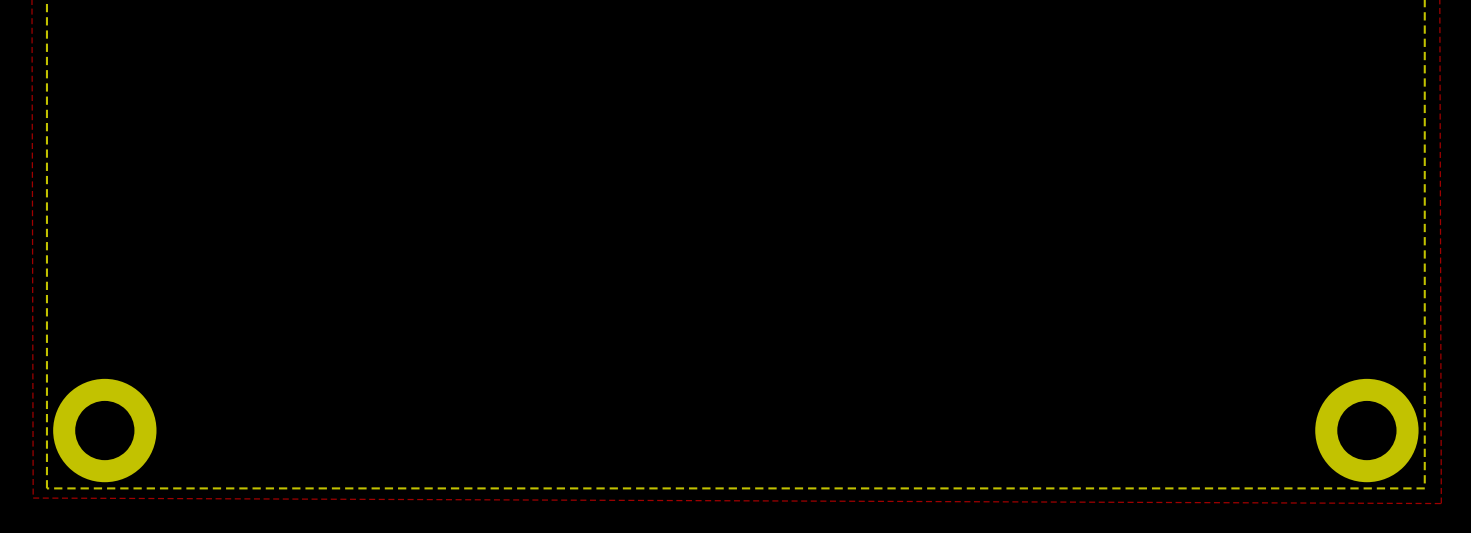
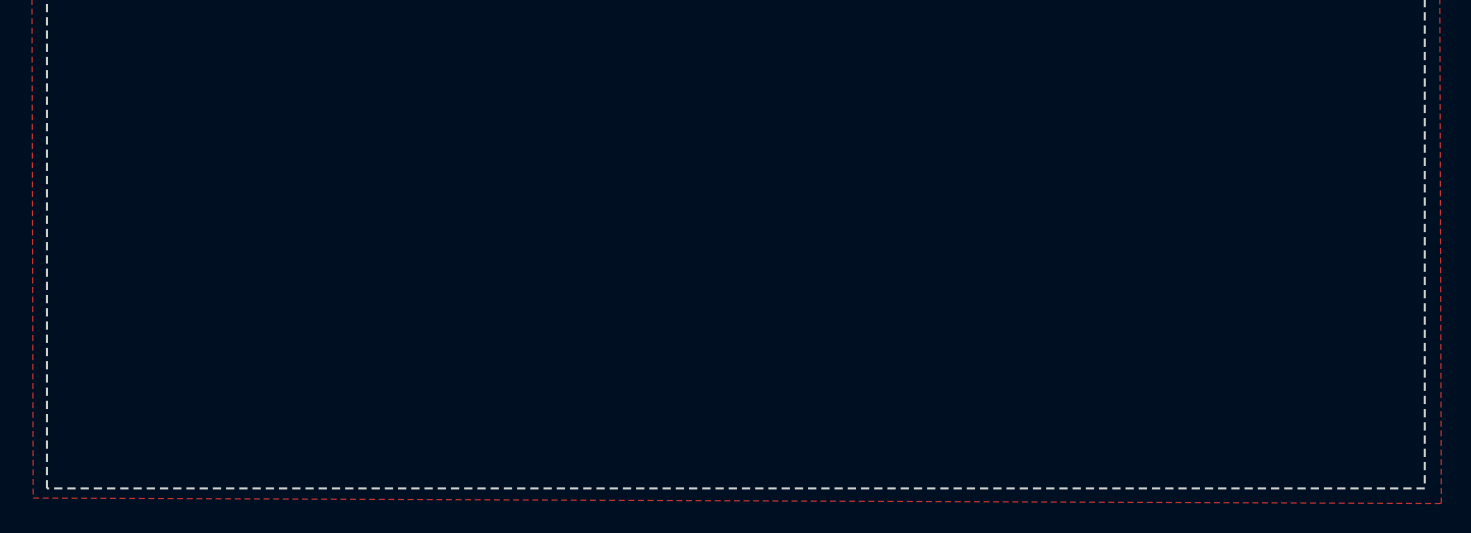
part: (104, 430) -> none
part: (1366, 430) -> none

